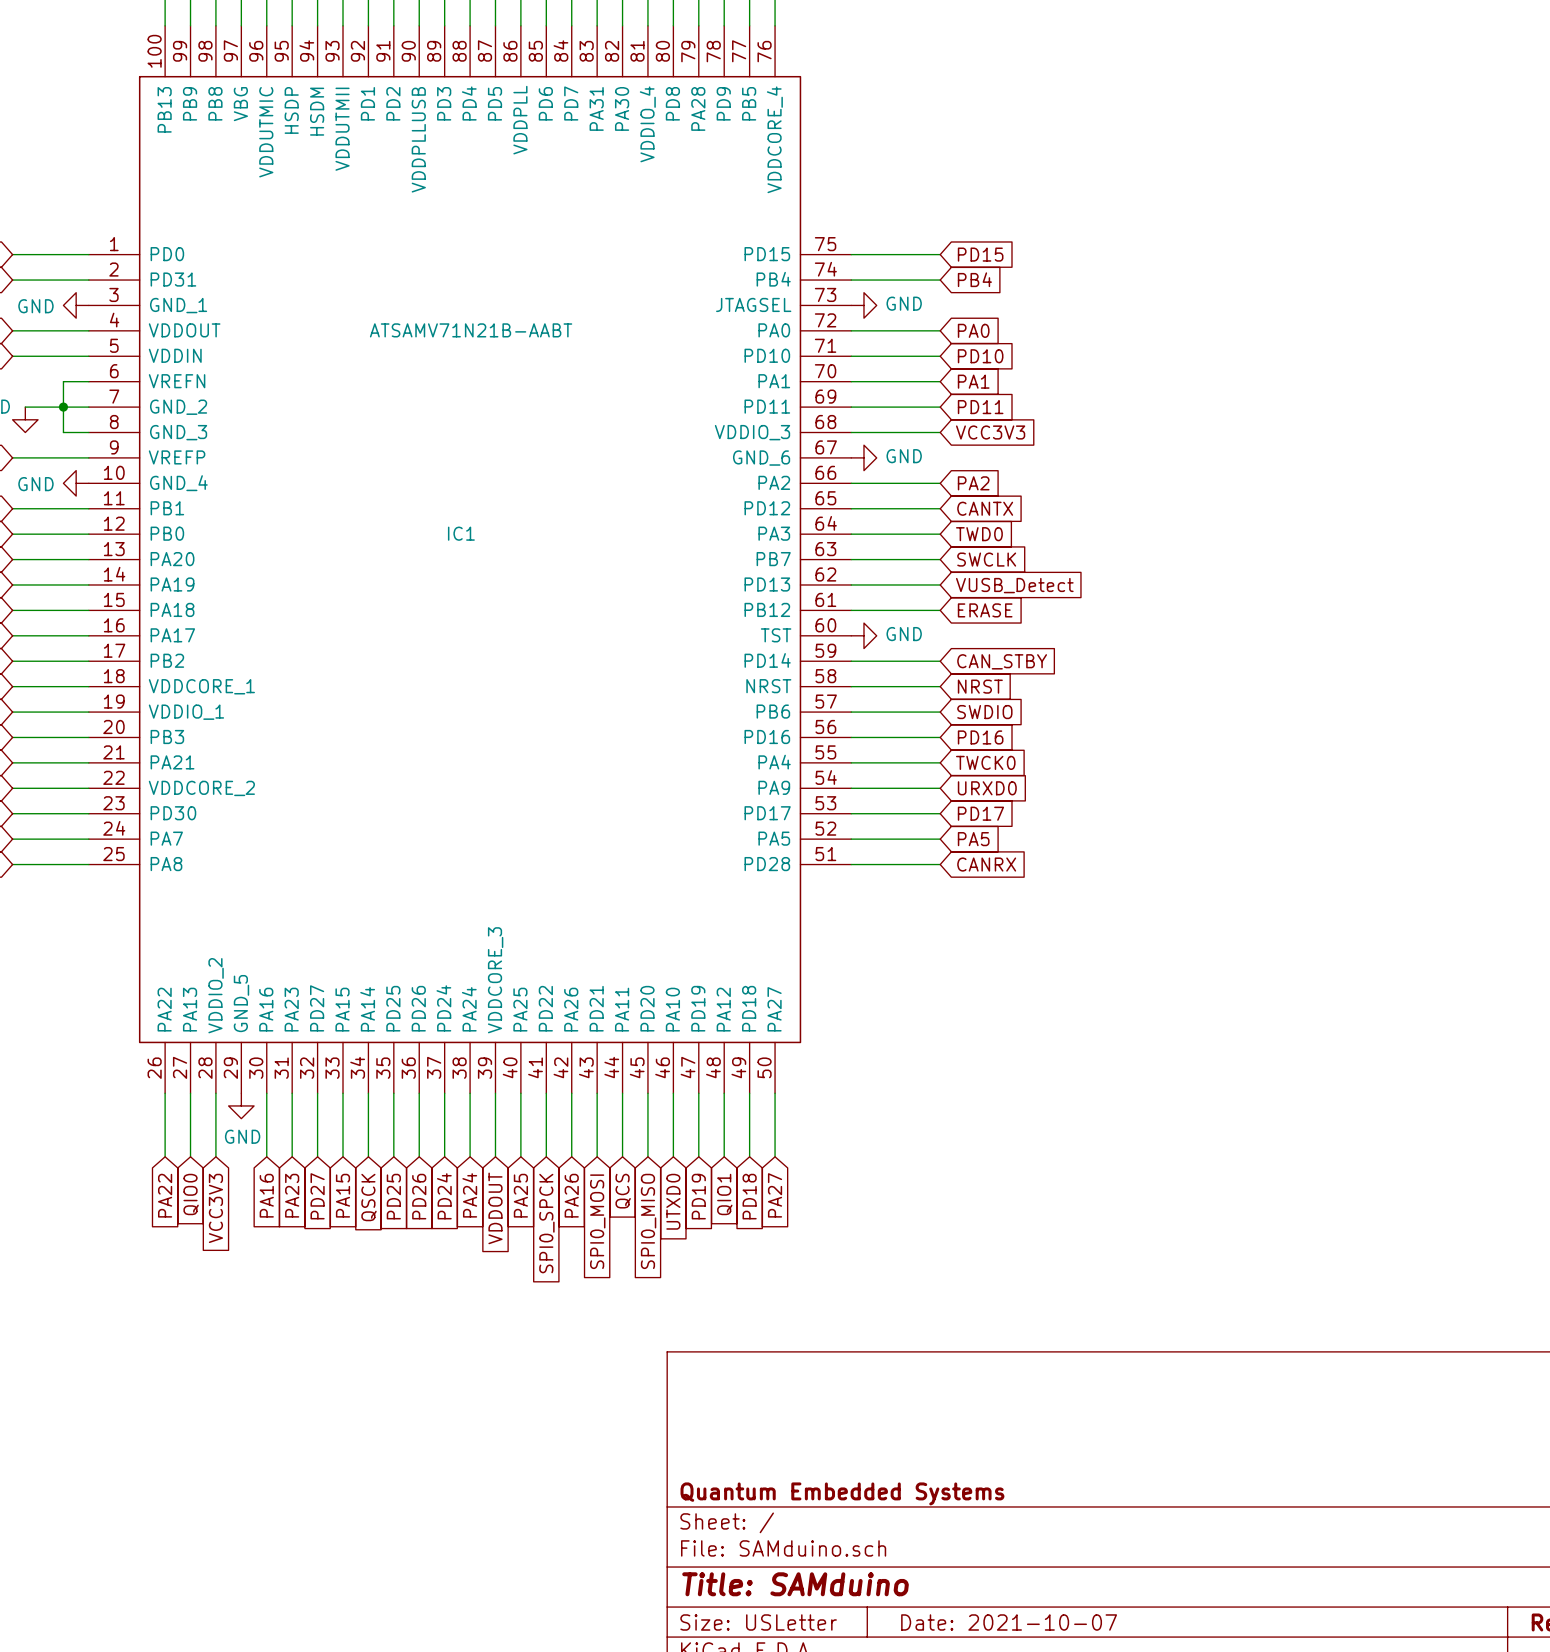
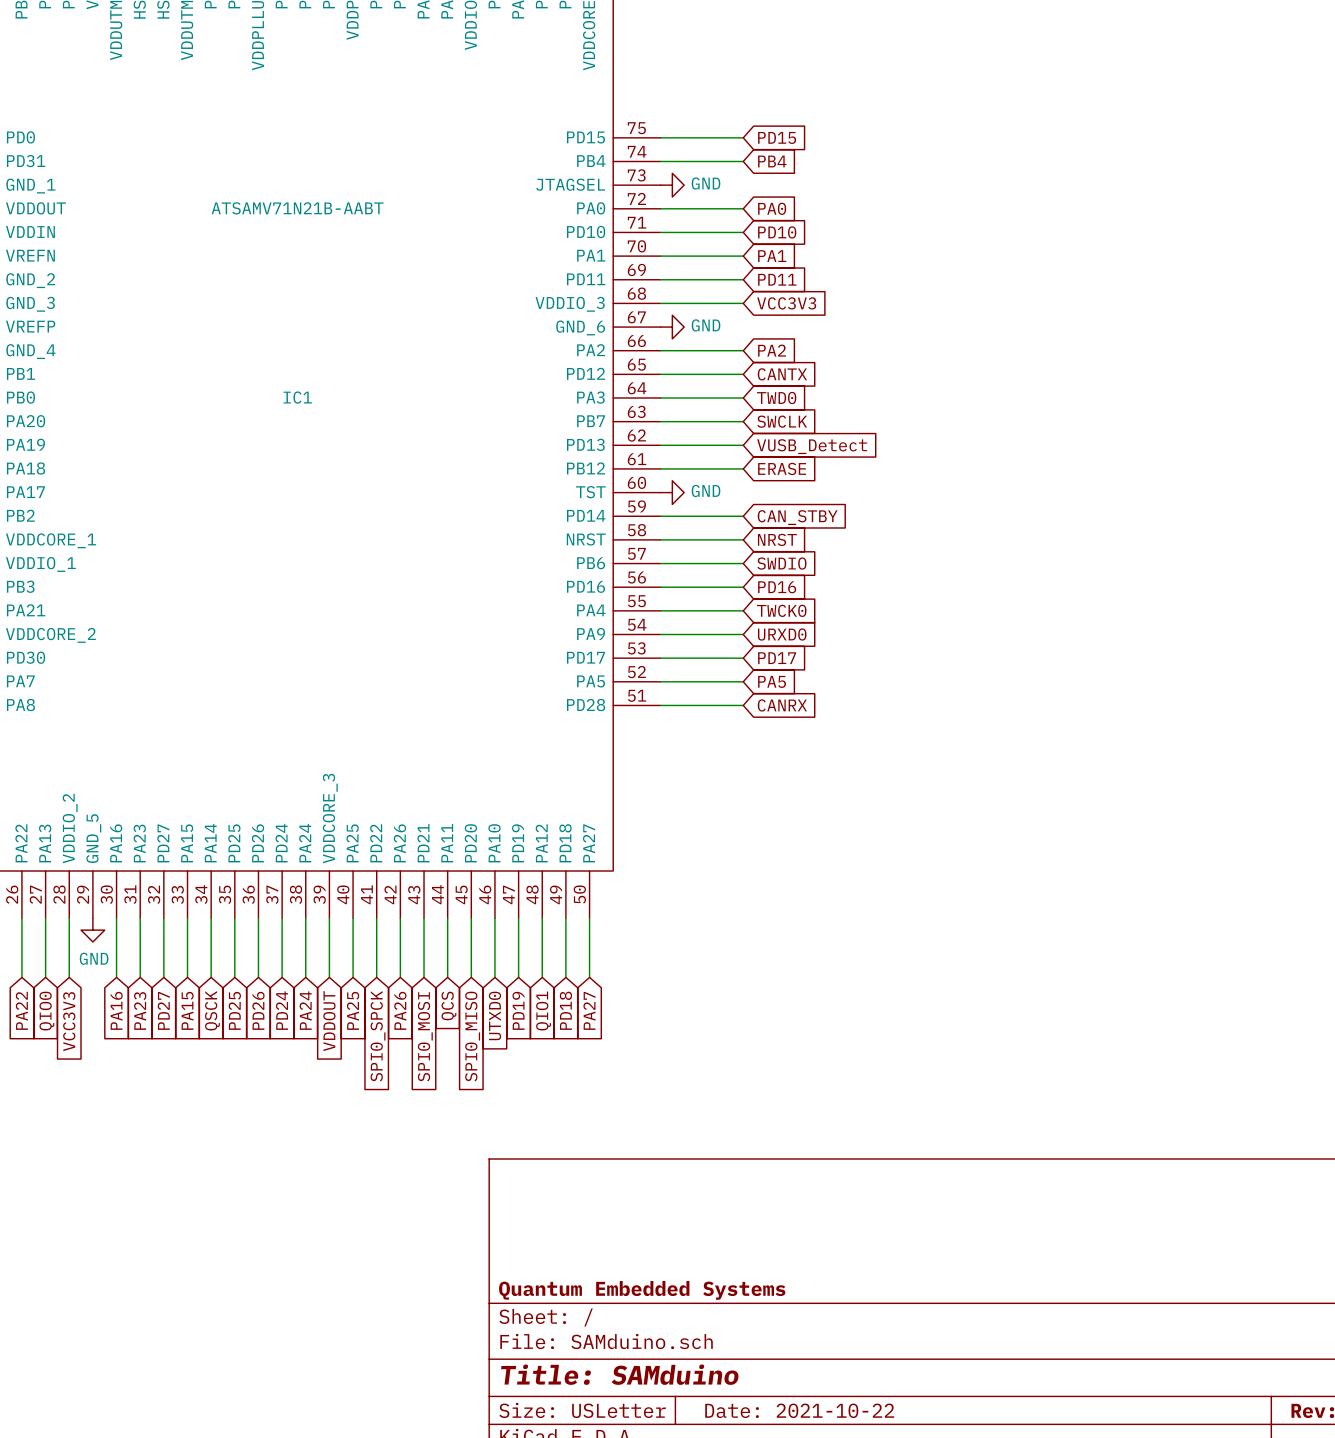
title block: Date: 2021-10-07 (1009, 1622) -> Date: 2021-10-22 (799, 1410)

